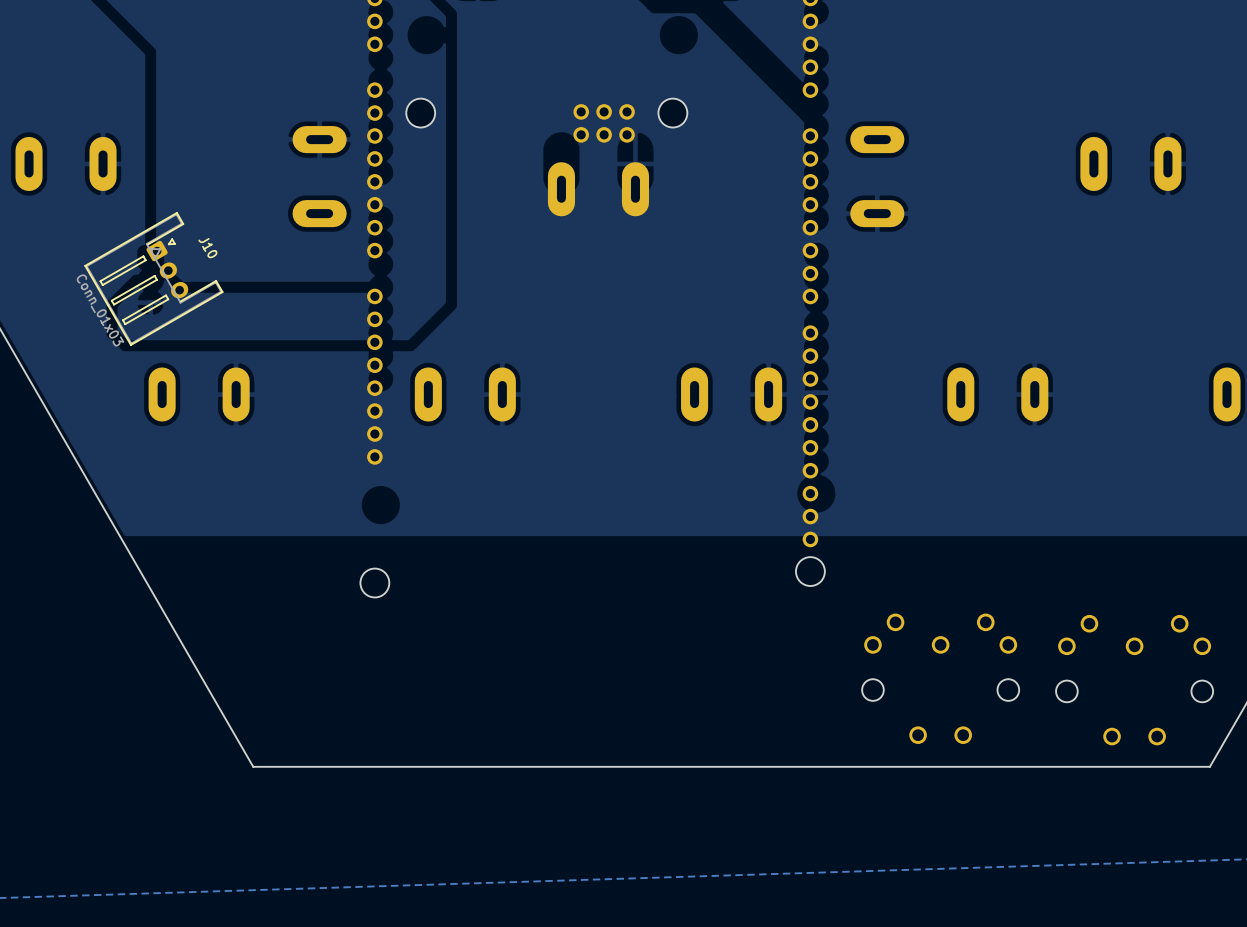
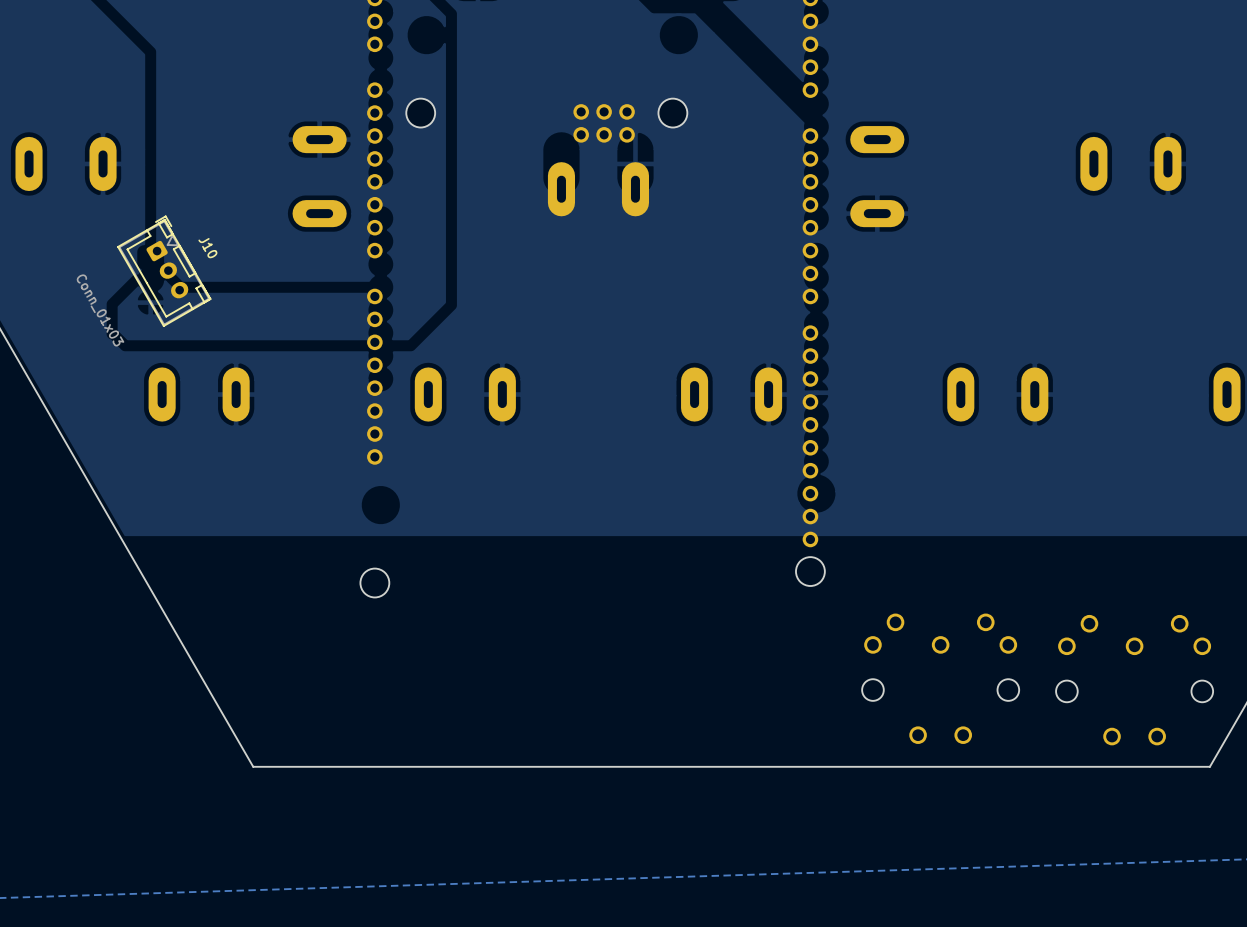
J10 footprint: [84, 212, 224, 346] -> [117, 215, 211, 327]

